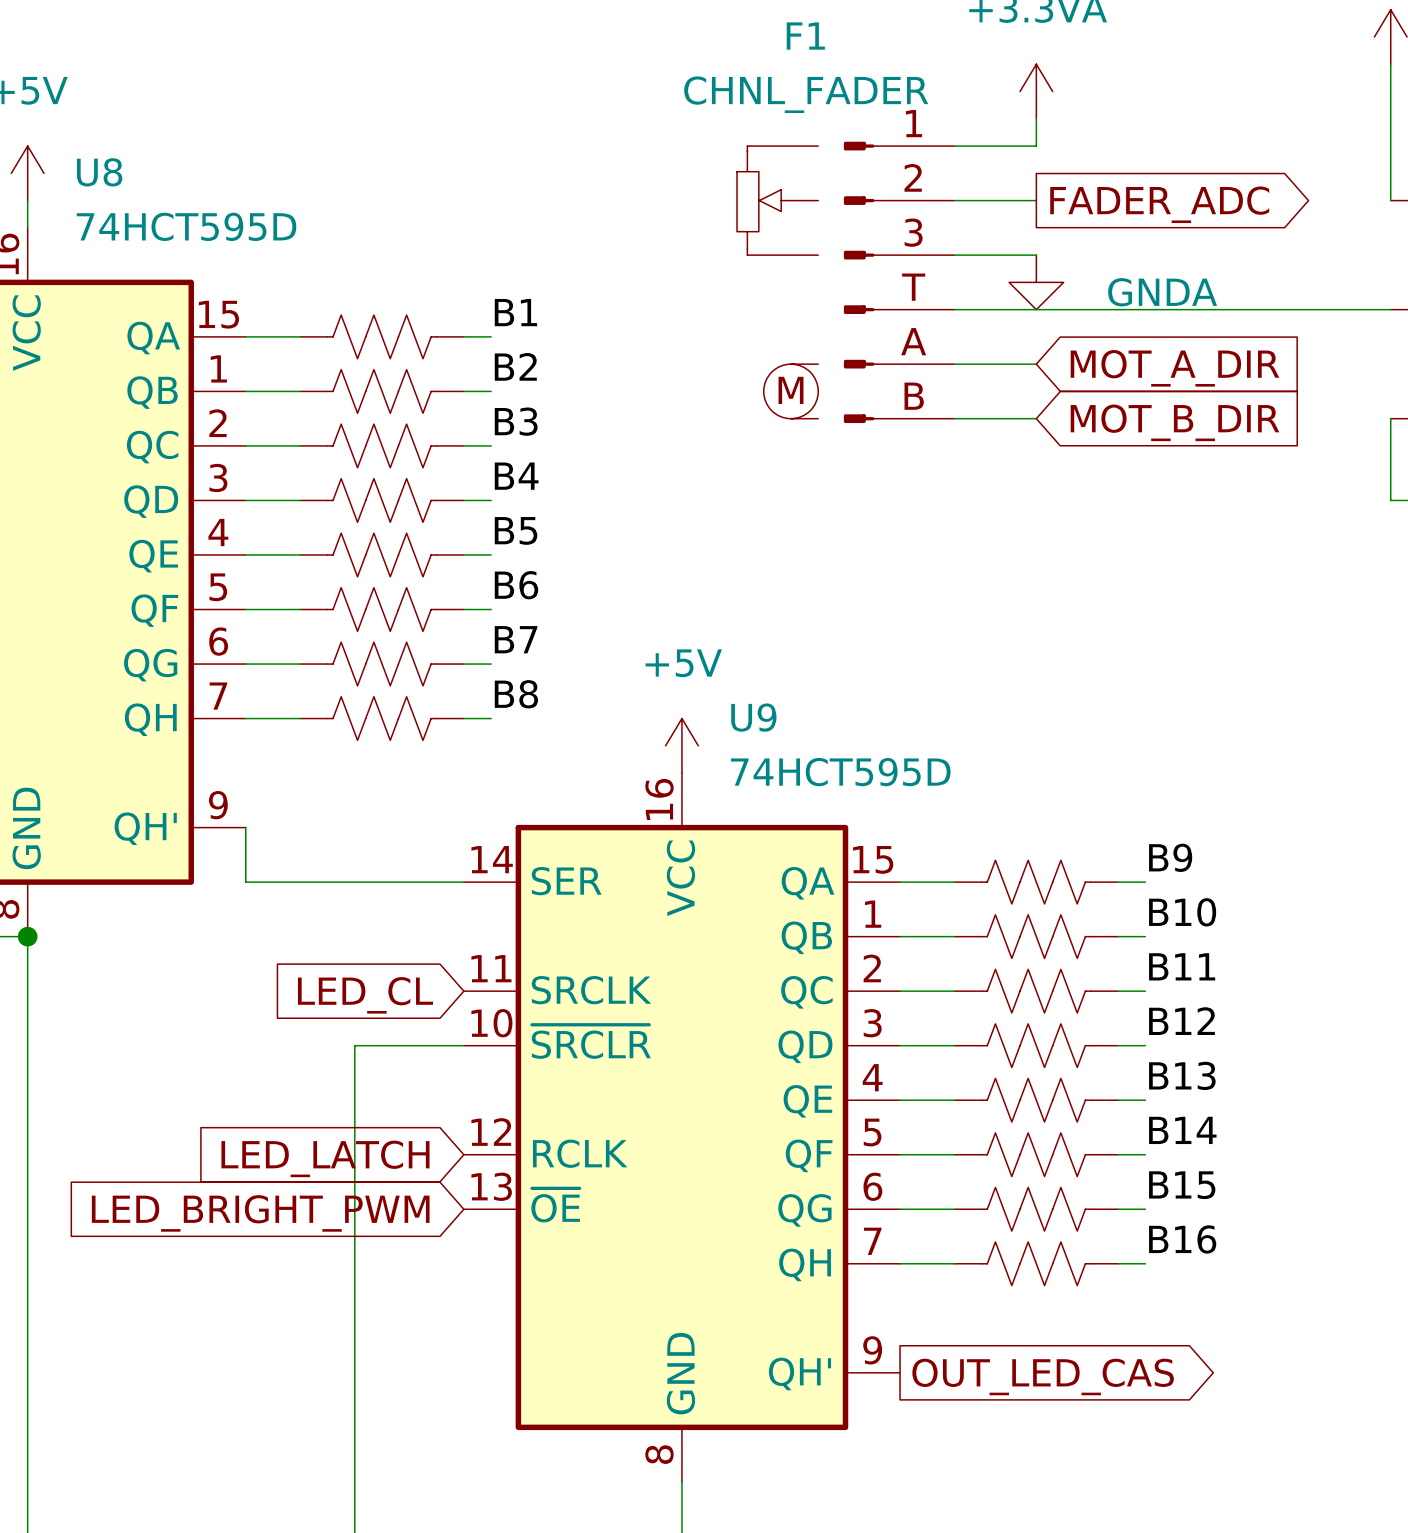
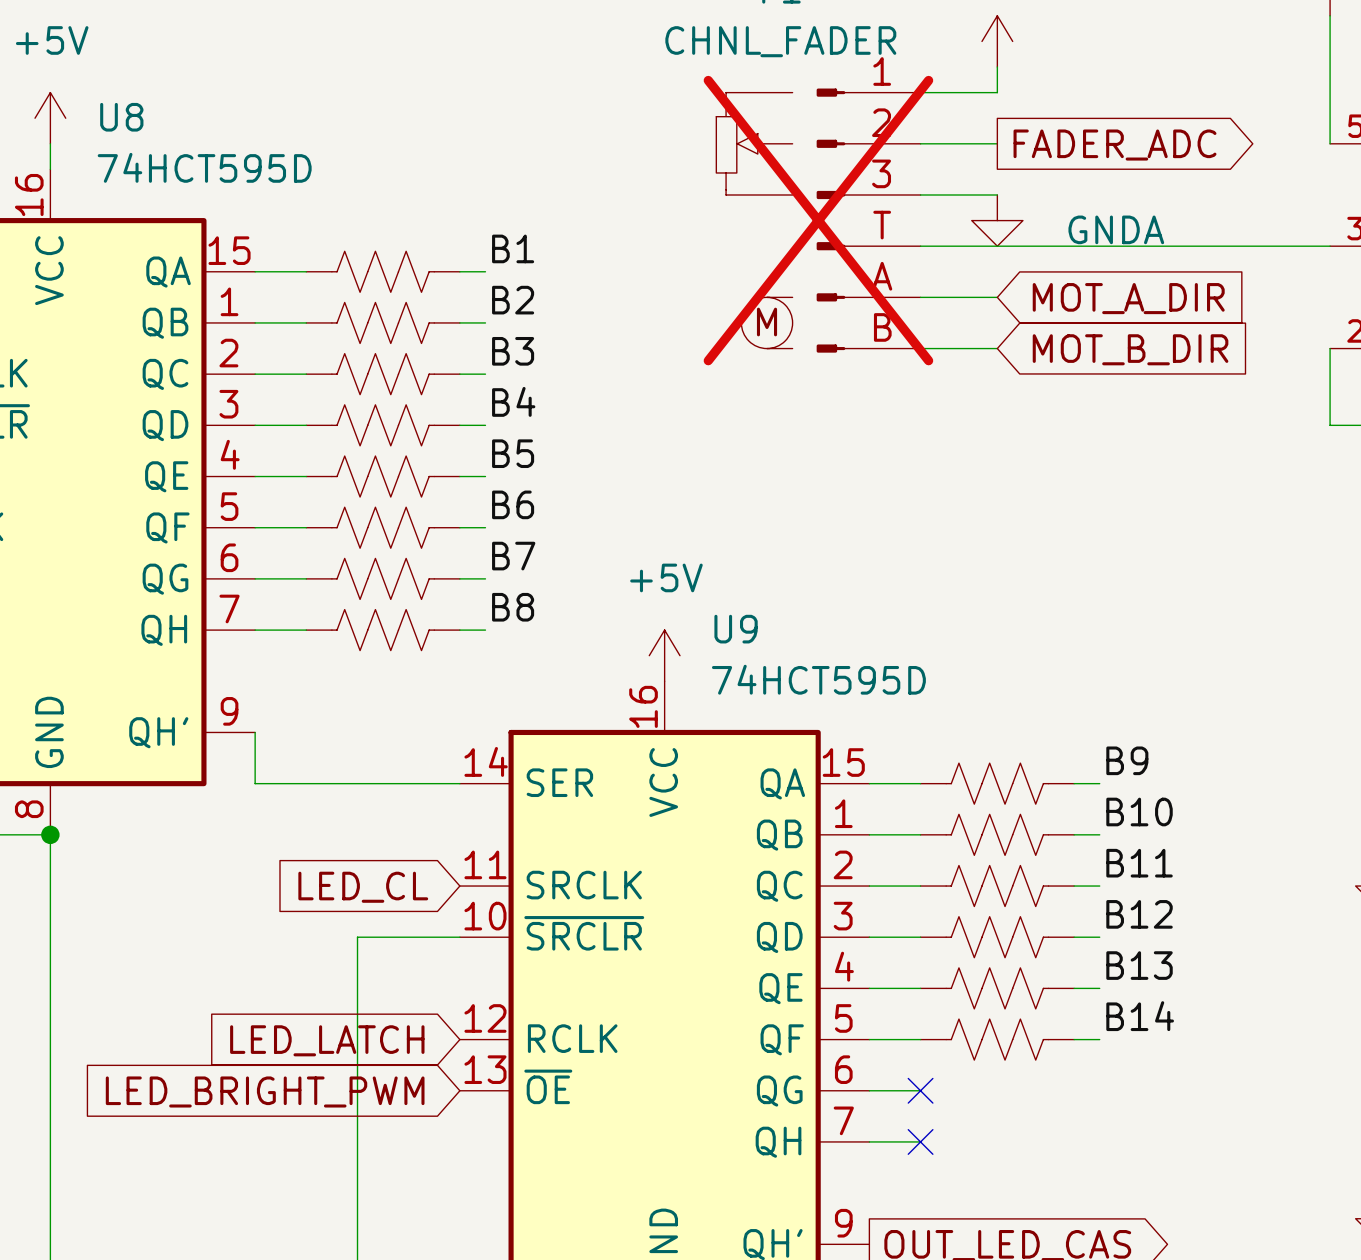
F1 do-not-place cross: none -> (818, 220)
label: B15 (1182, 1185) -> none
no-connect mark: none -> (920, 1090)
part: (1036, 1209) -> none
wire: (1118, 1209) (1145, 1209) -> none
label: B16 (1182, 1239) -> none
no-connect mark: none -> (920, 1141)
part: (1036, 1263) -> none
wire: (1118, 1263) (1145, 1263) -> none

